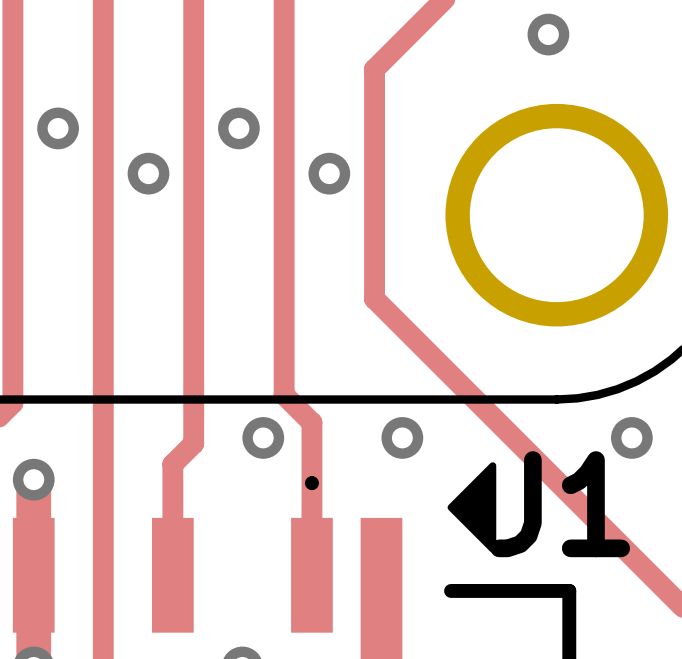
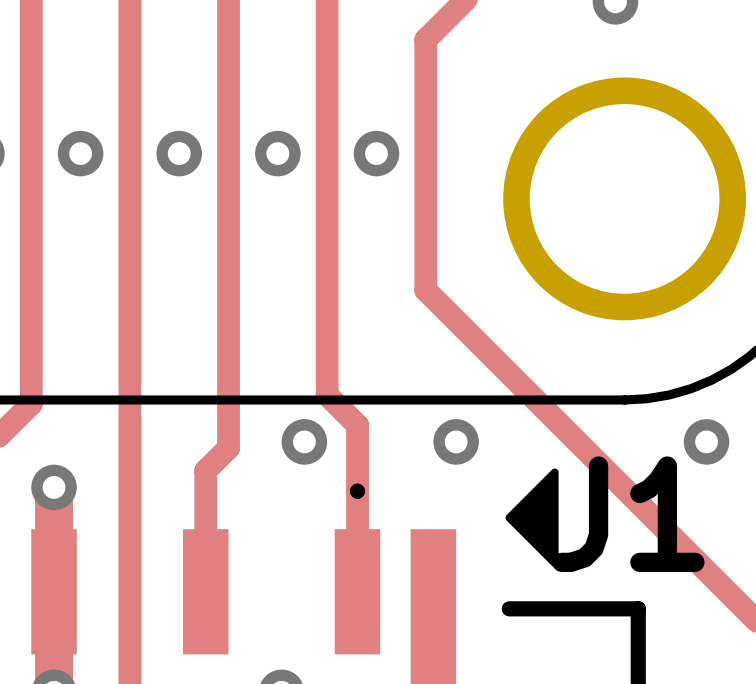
via position: (58, 128) -> (80, 153)
via position: (238, 128) -> (277, 153)

